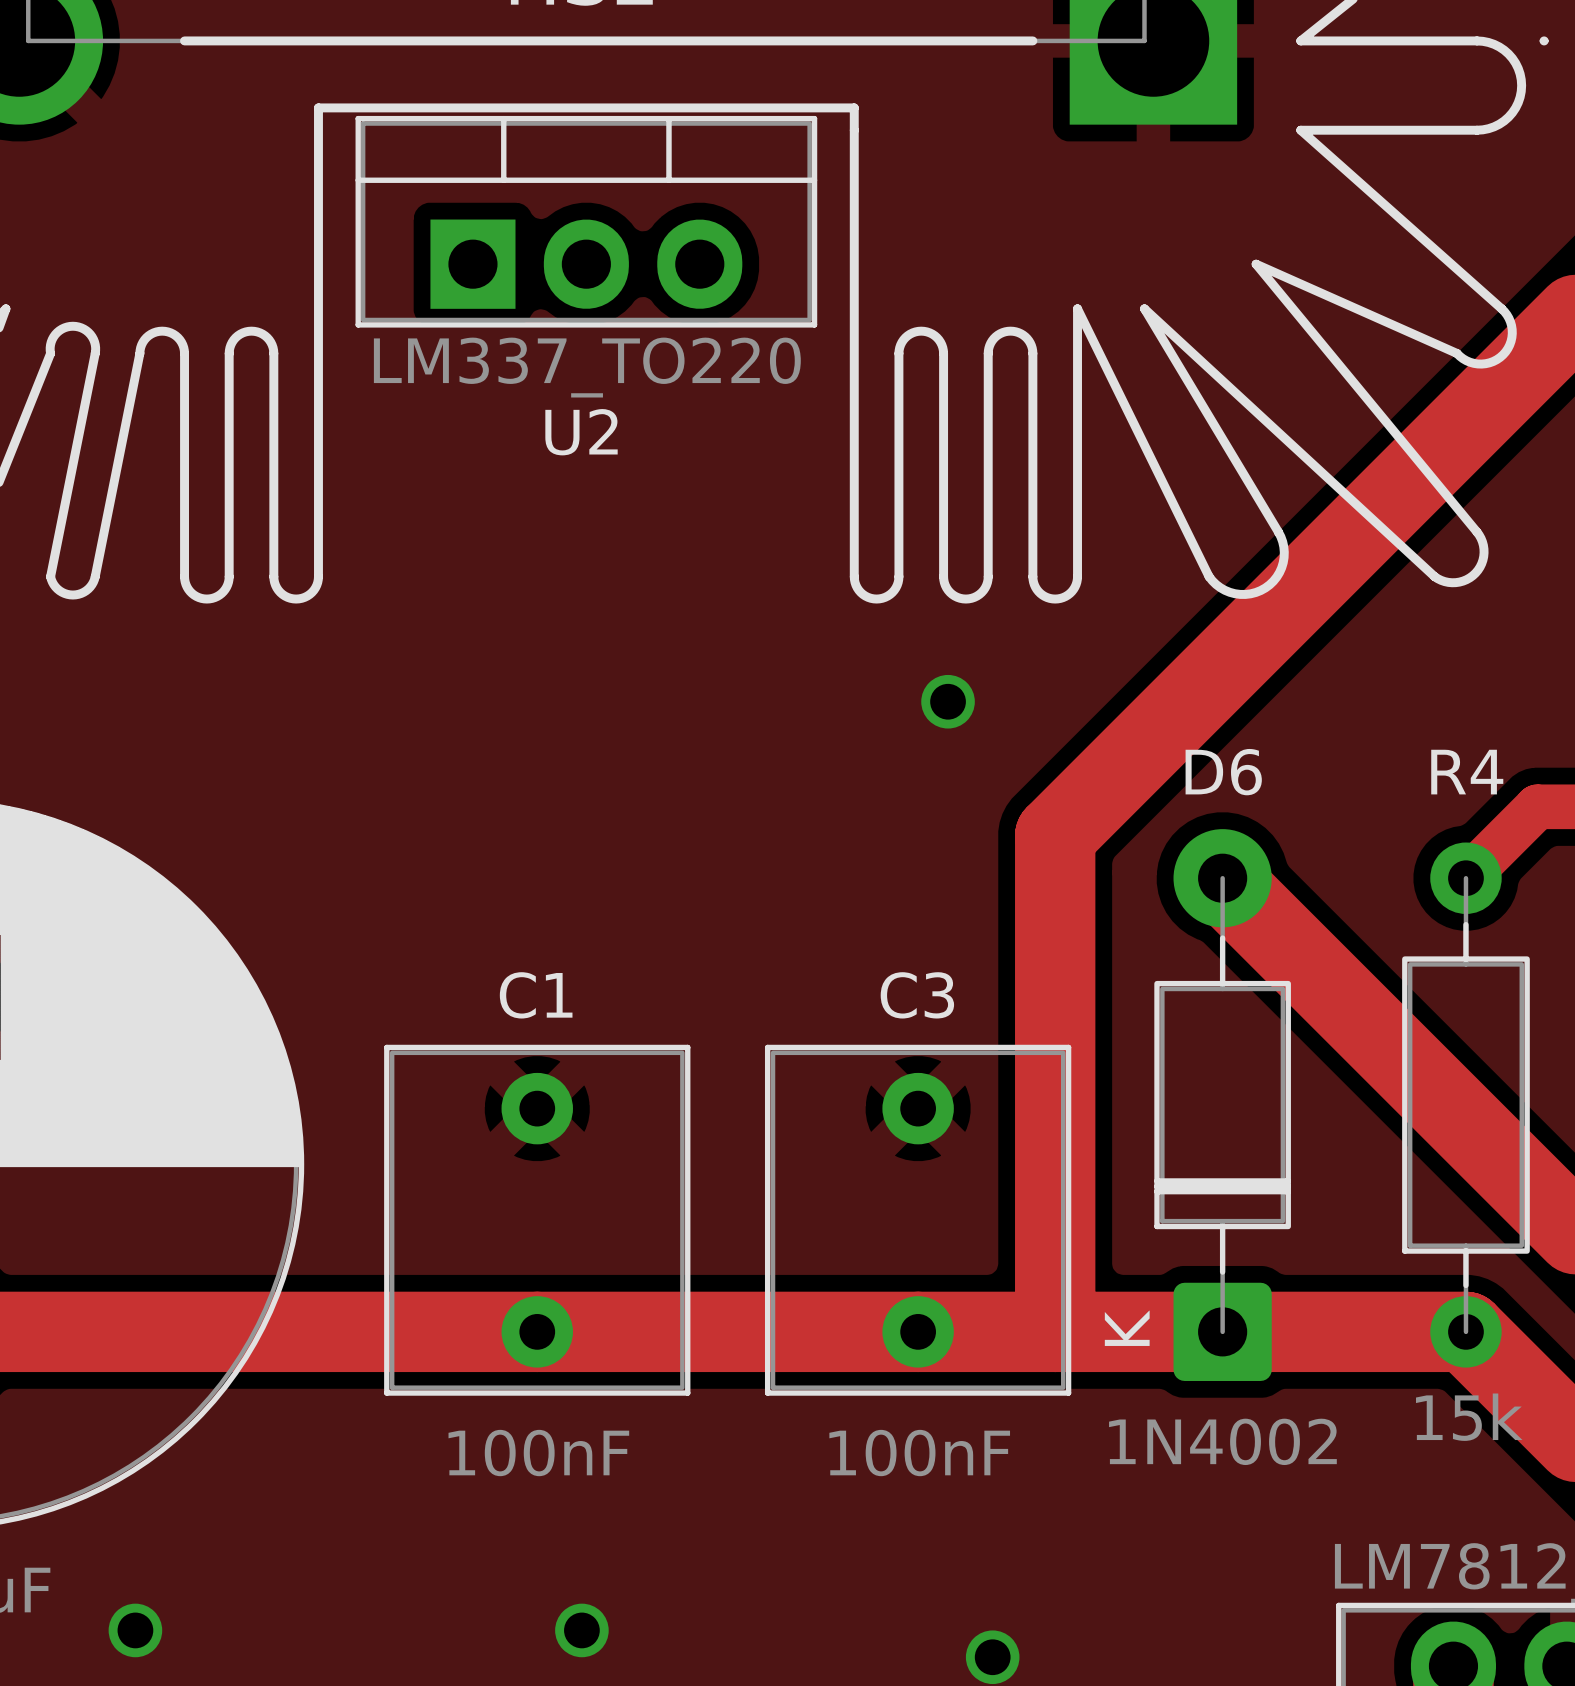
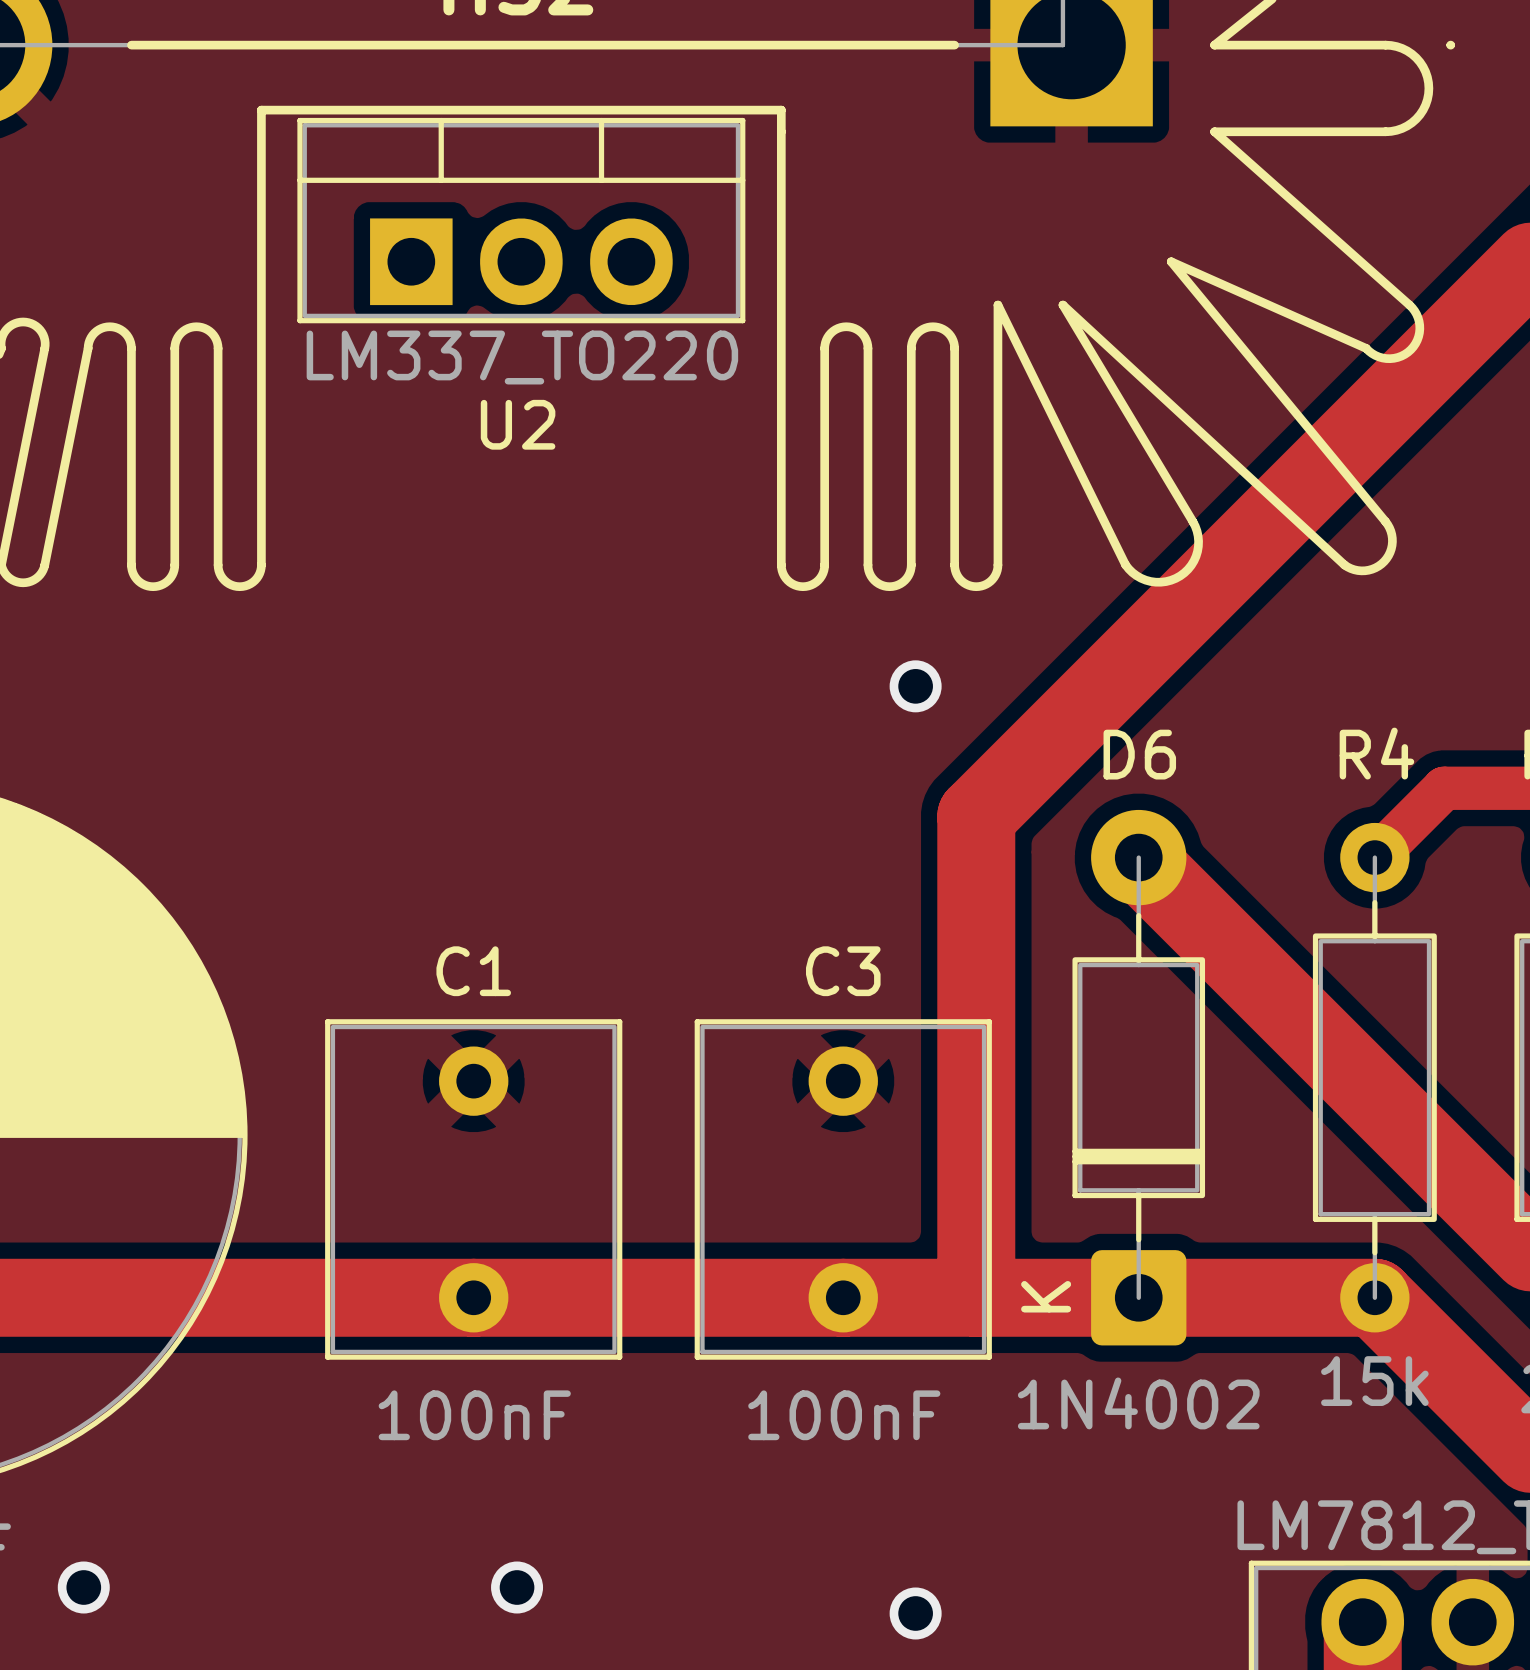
via position: (948, 701) -> (915, 686)

